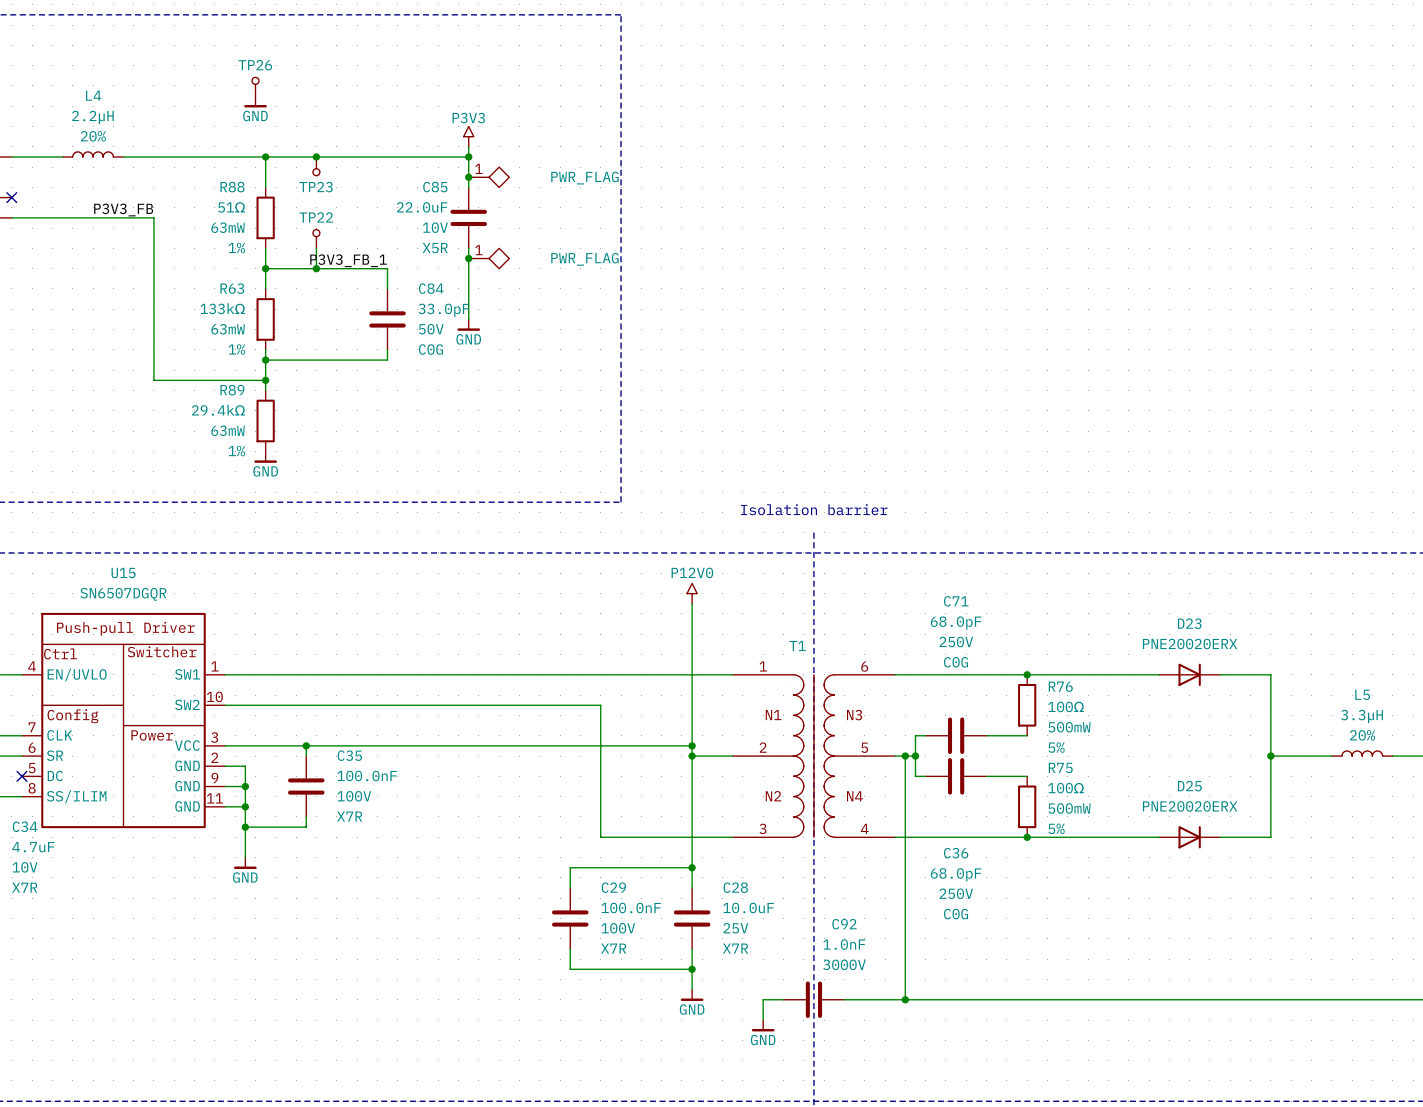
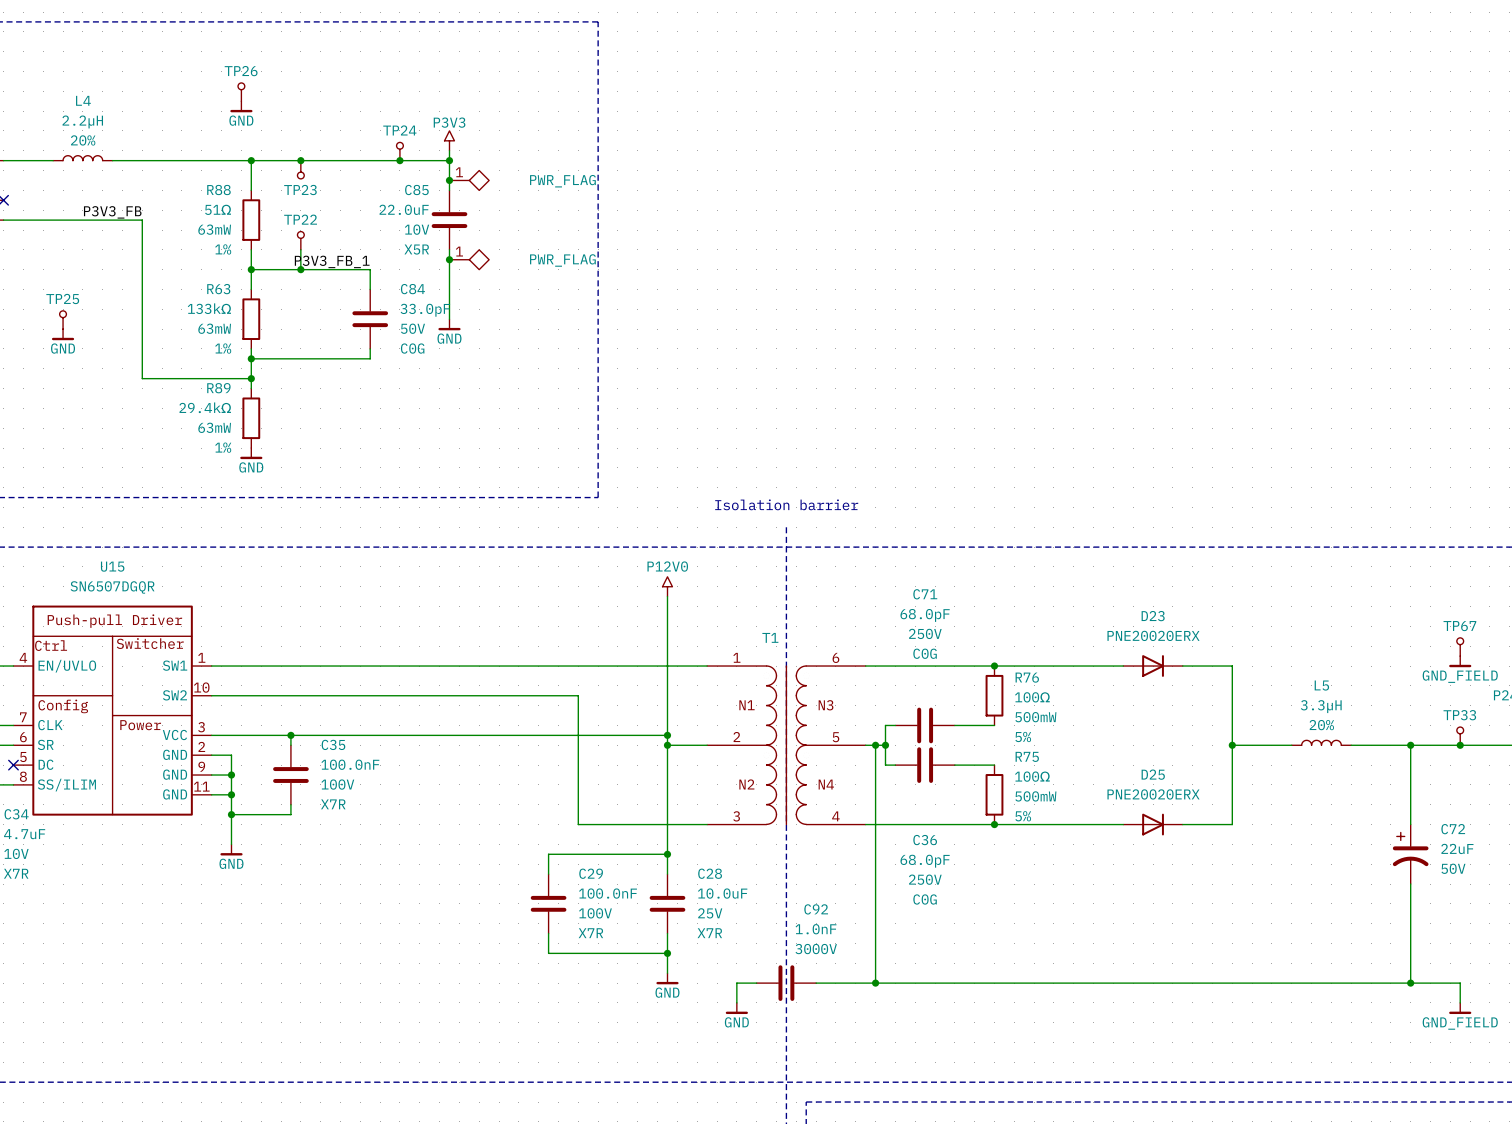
TP24: none -> (399, 151)
junction: none -> (399, 160)
TP25: none -> (63, 319)
power symbol: none -> GND (63, 334)

